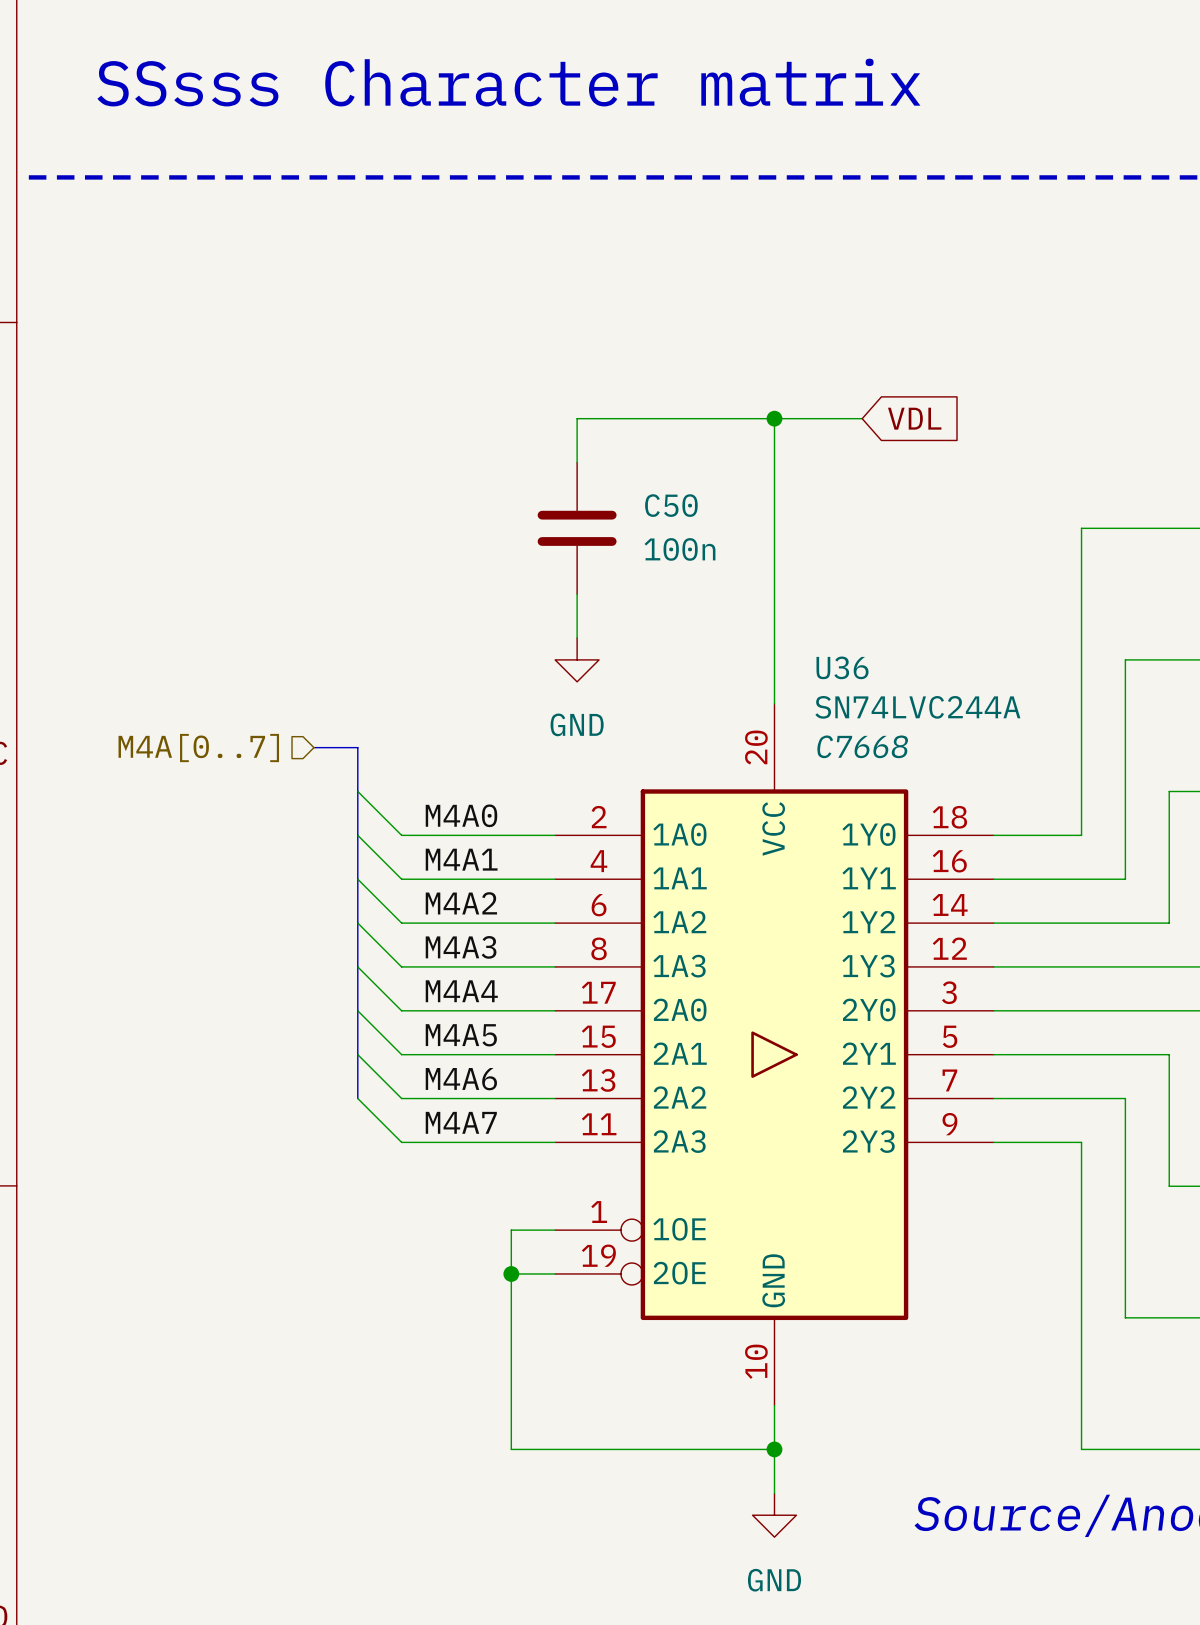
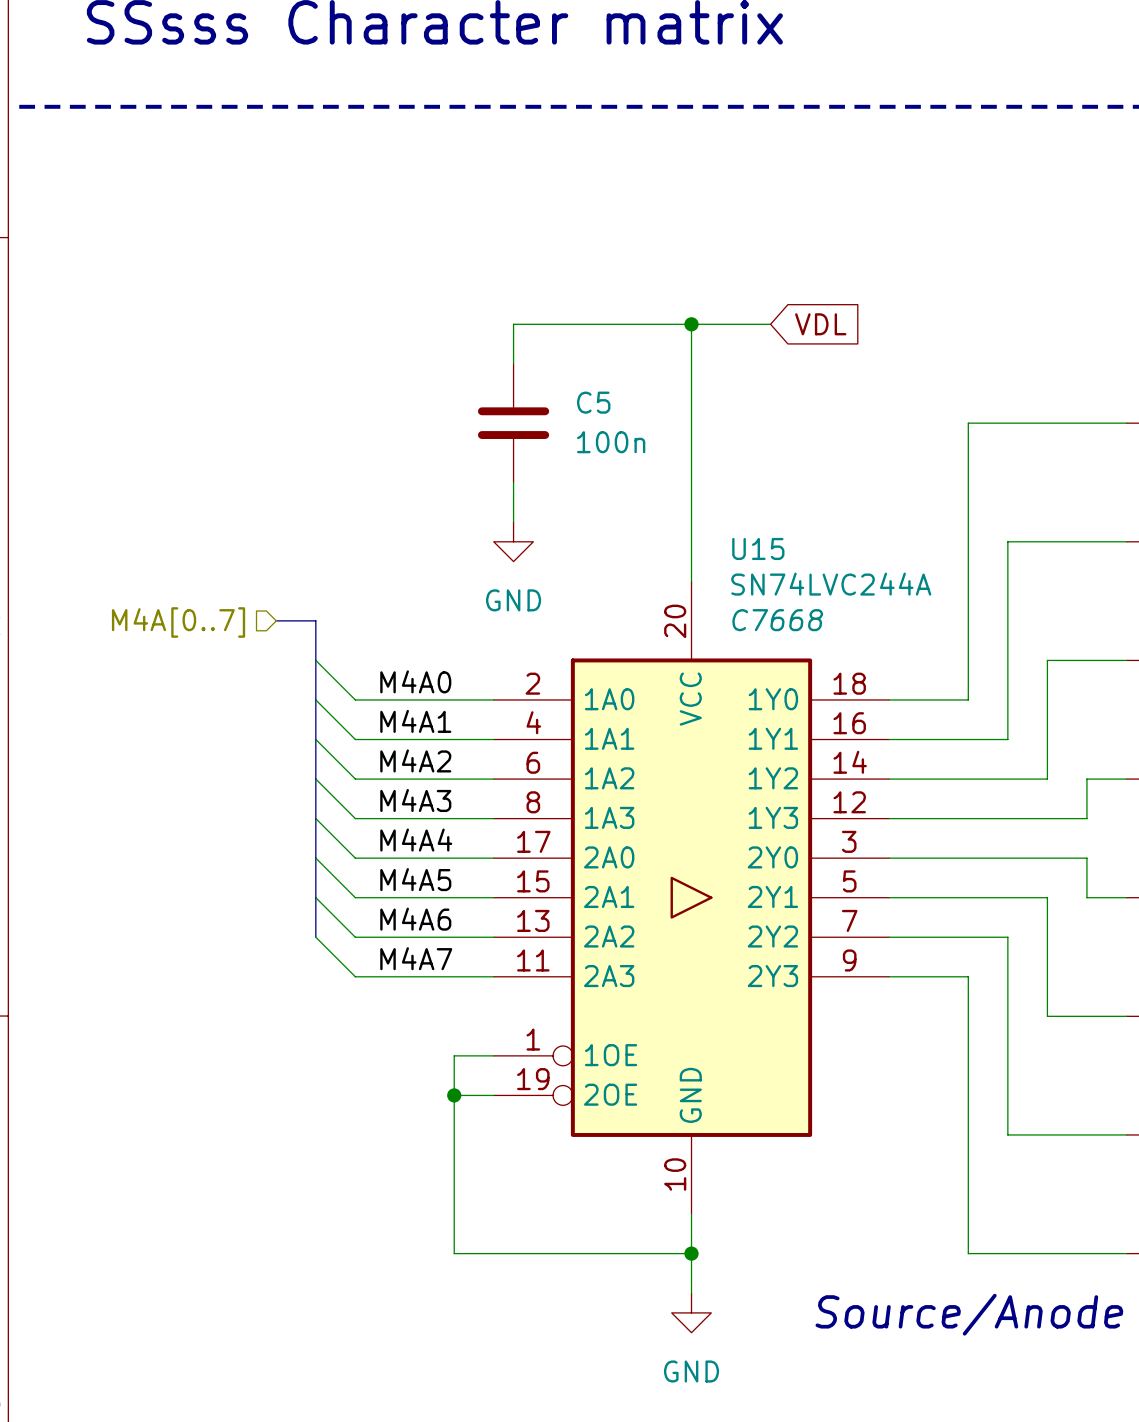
C50 name: C50 (671, 505) -> C5 (593, 402)
U36 name: U36 (842, 667) -> U15 (758, 548)

